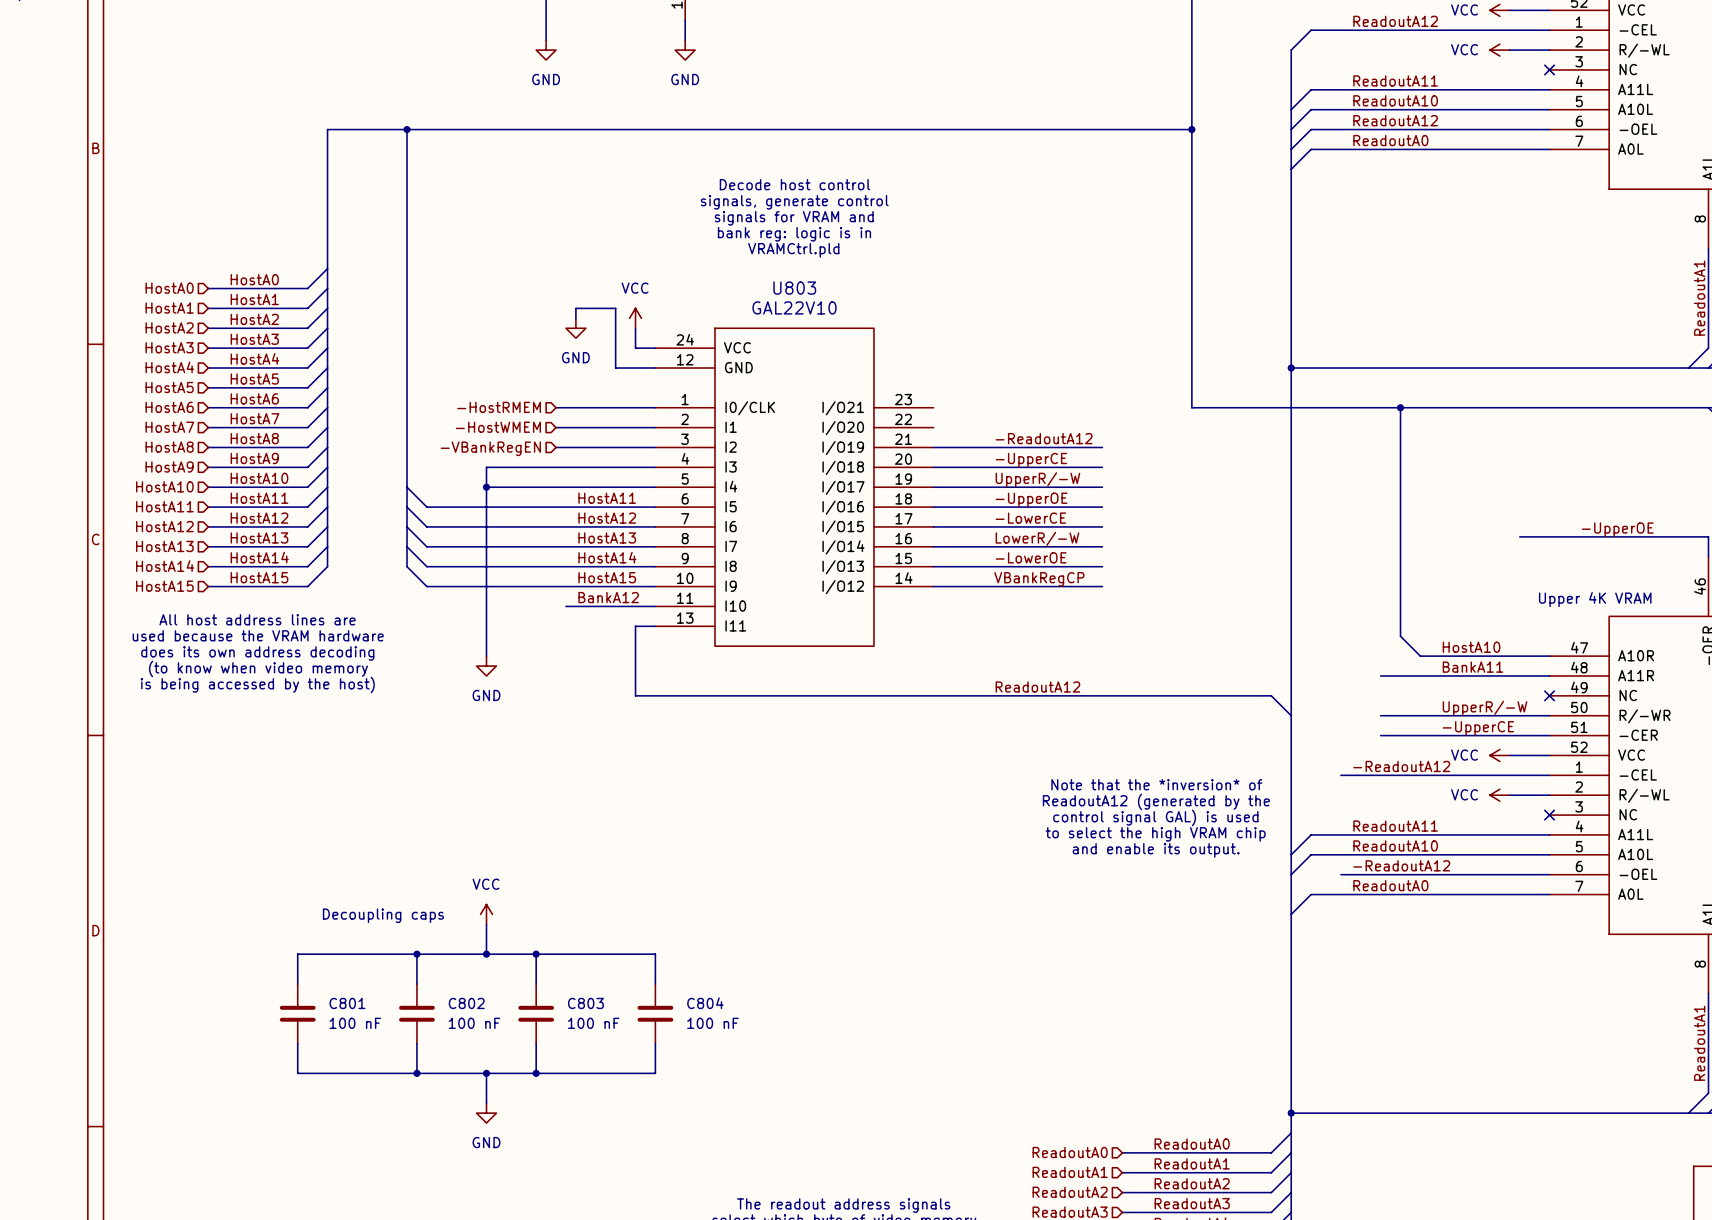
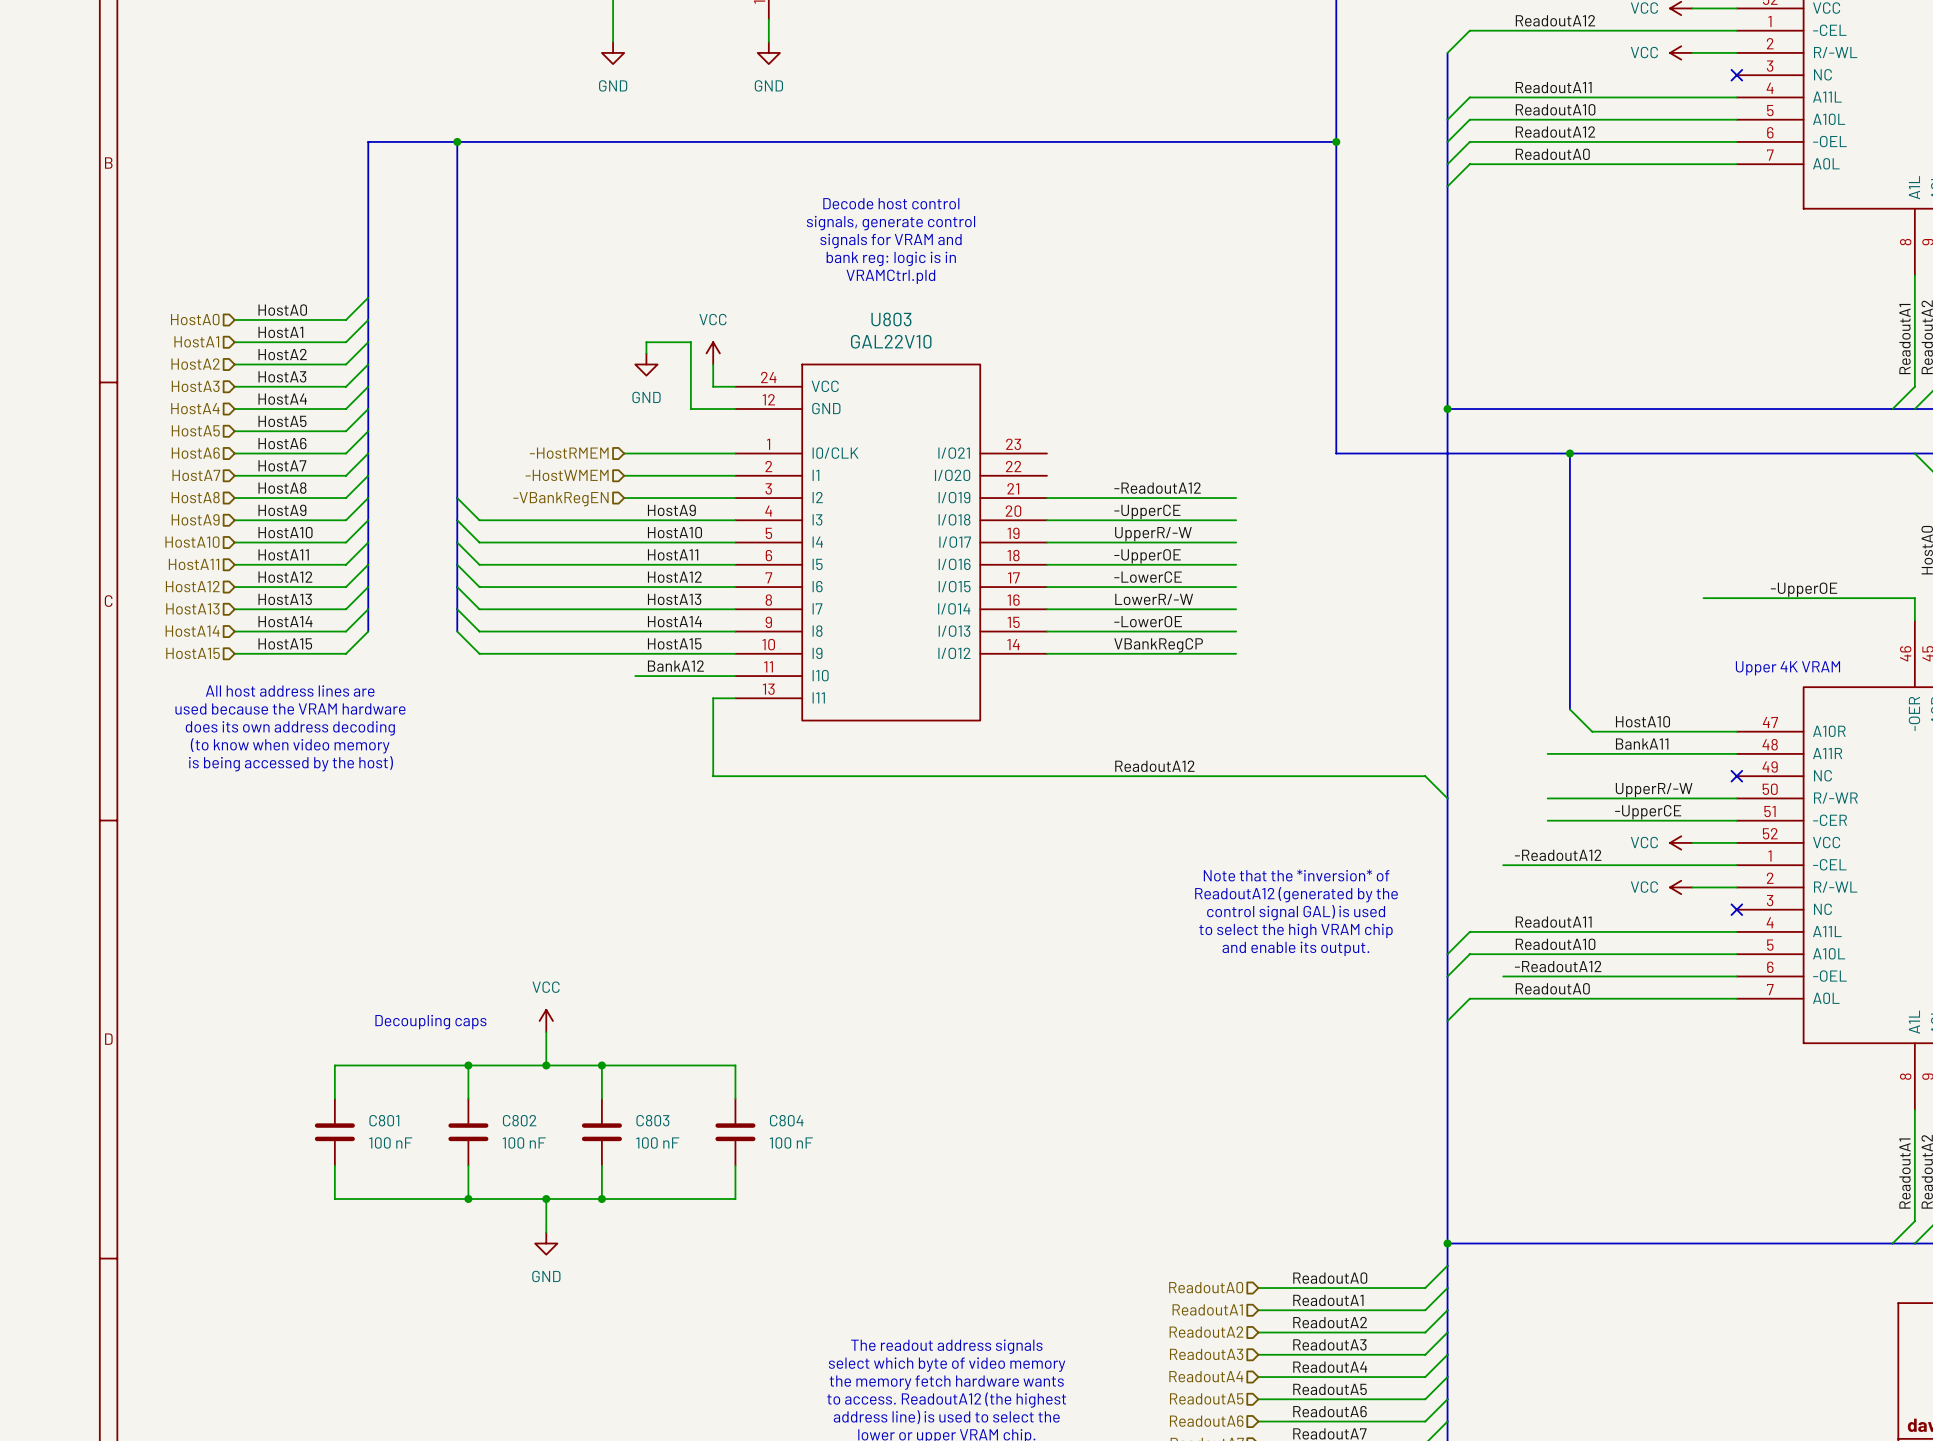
label: none -> HostA9 (671, 510)
wire: none -> (457, 520) (479, 542) (546, 542)
wire: (486, 467) (486, 656) -> (546, 520) (479, 520) (457, 498)
label: none -> HostA10 (674, 532)
junction: (486, 487) -> none
power symbol: GND (486, 666) -> none

